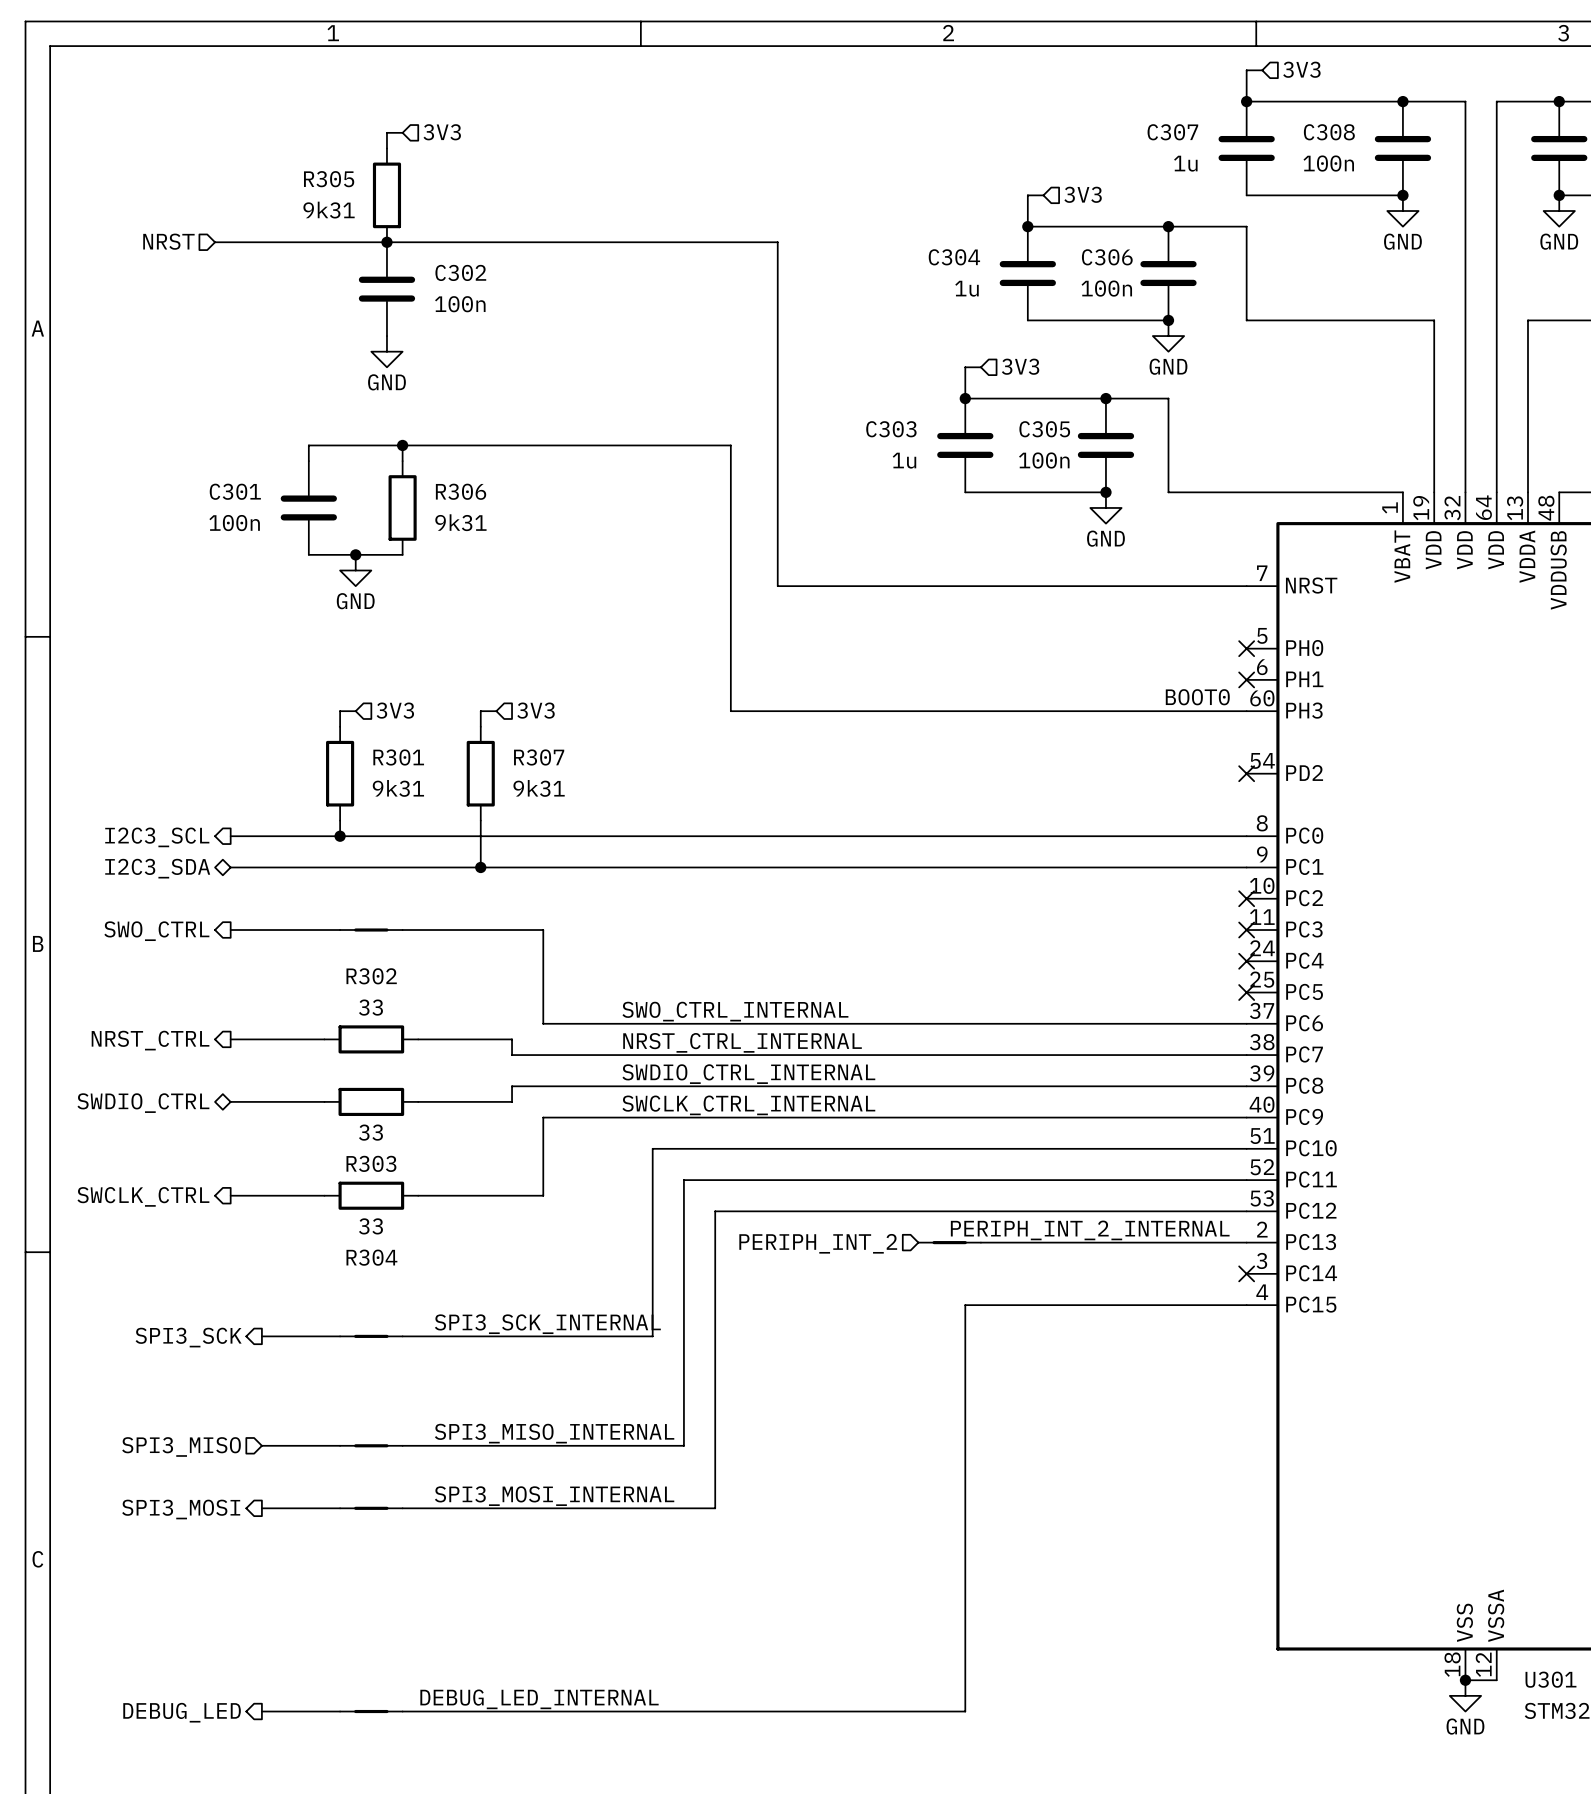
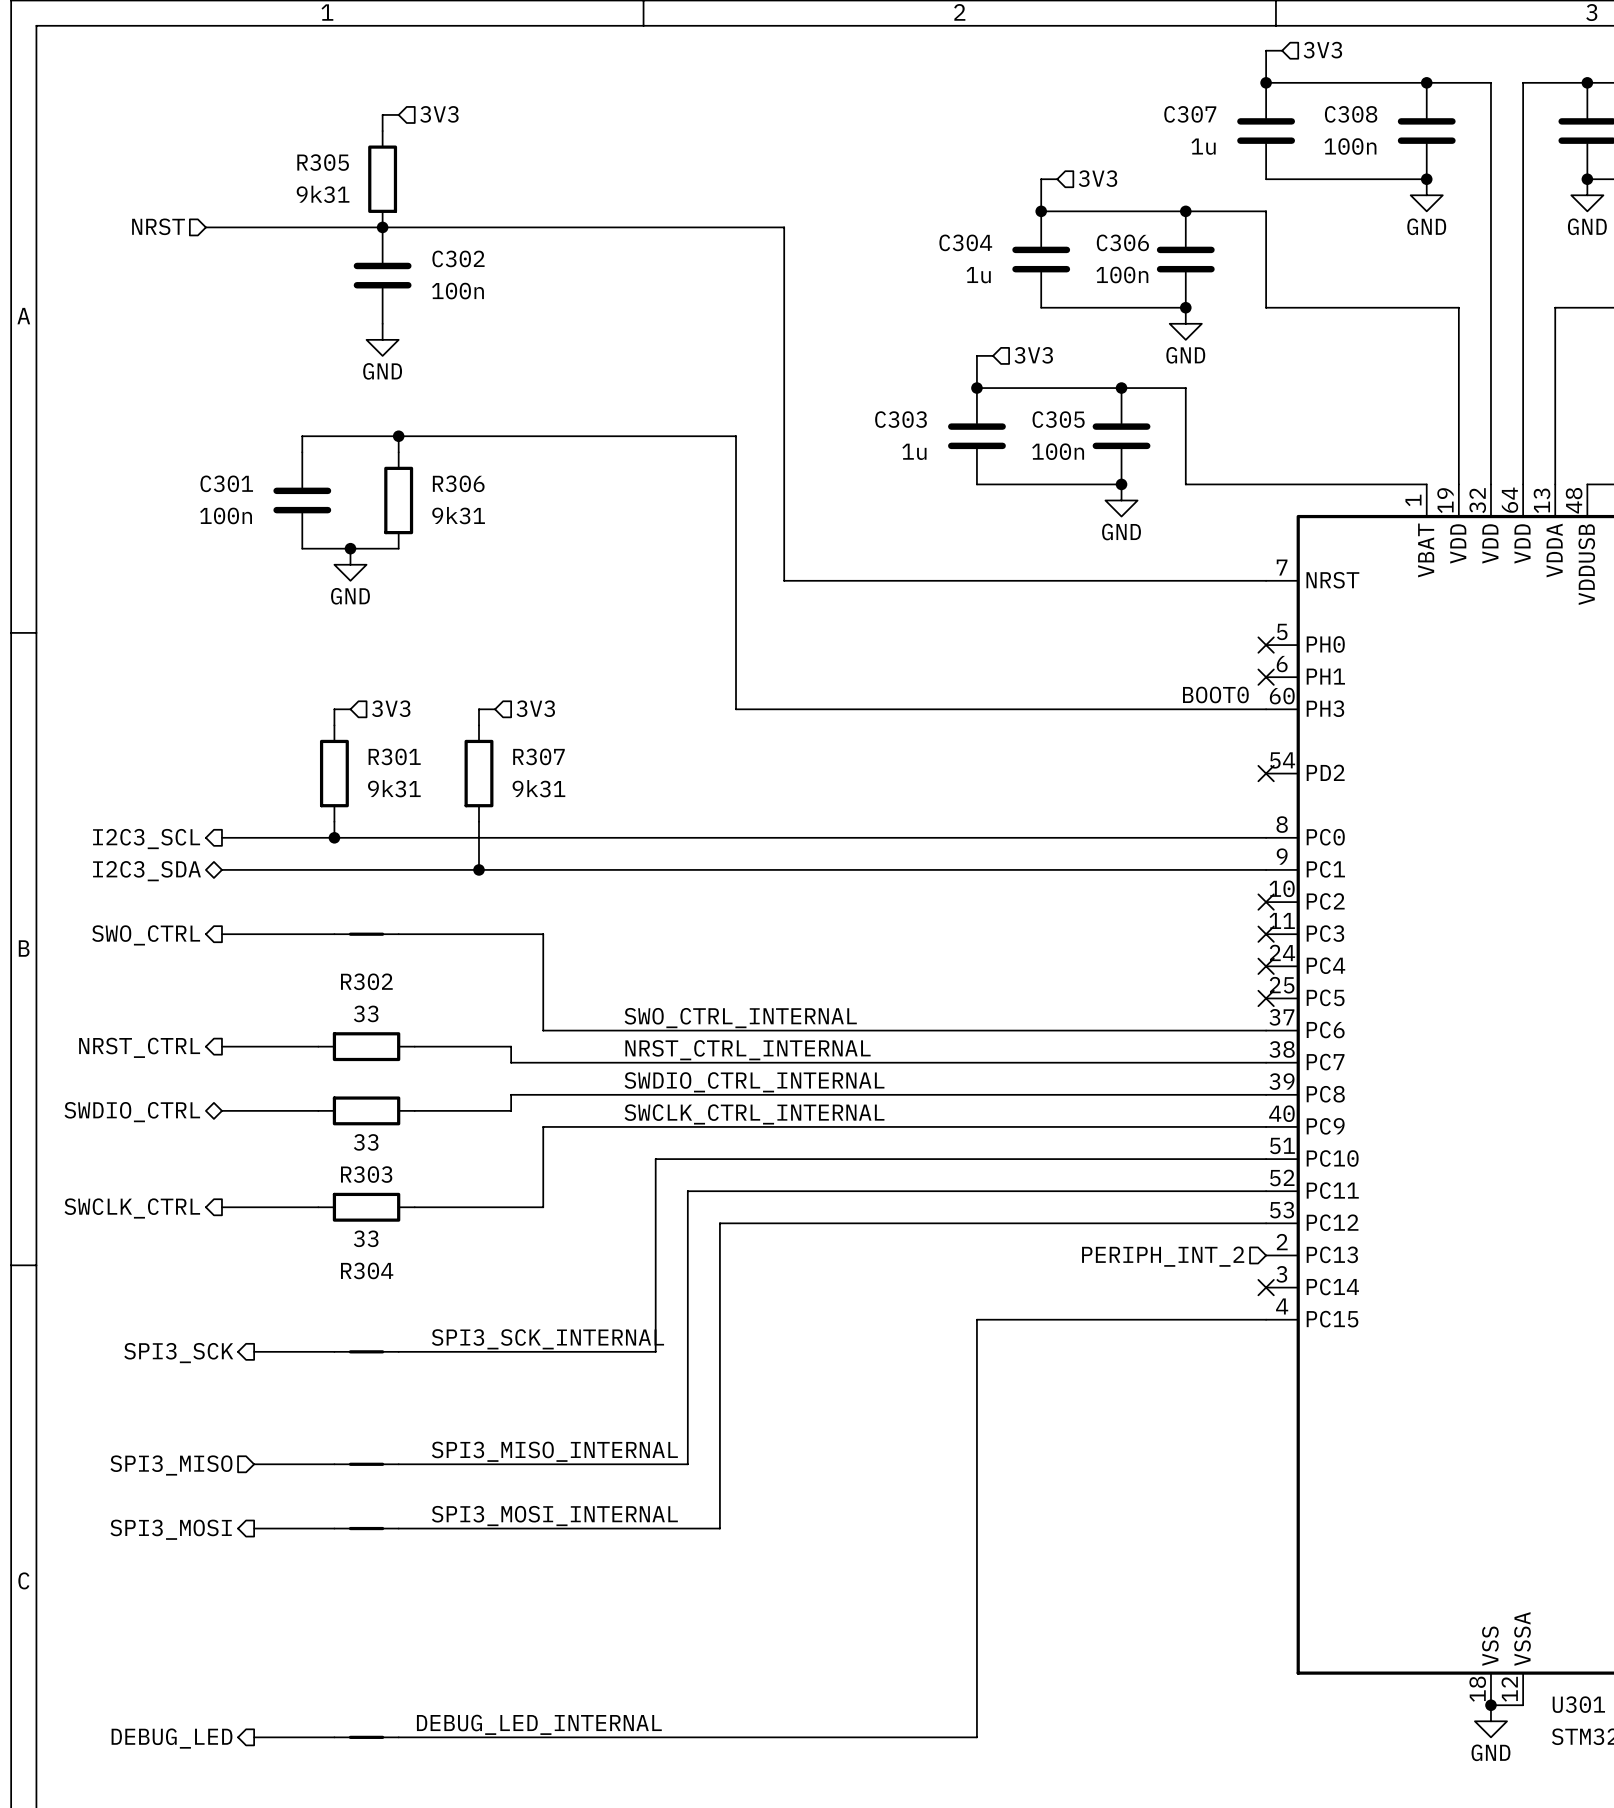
label: PERIPH_INT_2_INTERNAL (1090, 1230) -> none
part: (949, 1242) -> none
wire: (980, 1242) (1246, 1242) -> none
hierarchical label: PERIPH_INT_2 (818, 1243) -> none
hierarchical label: none -> PERIPH_INT_2 (1163, 1256)

